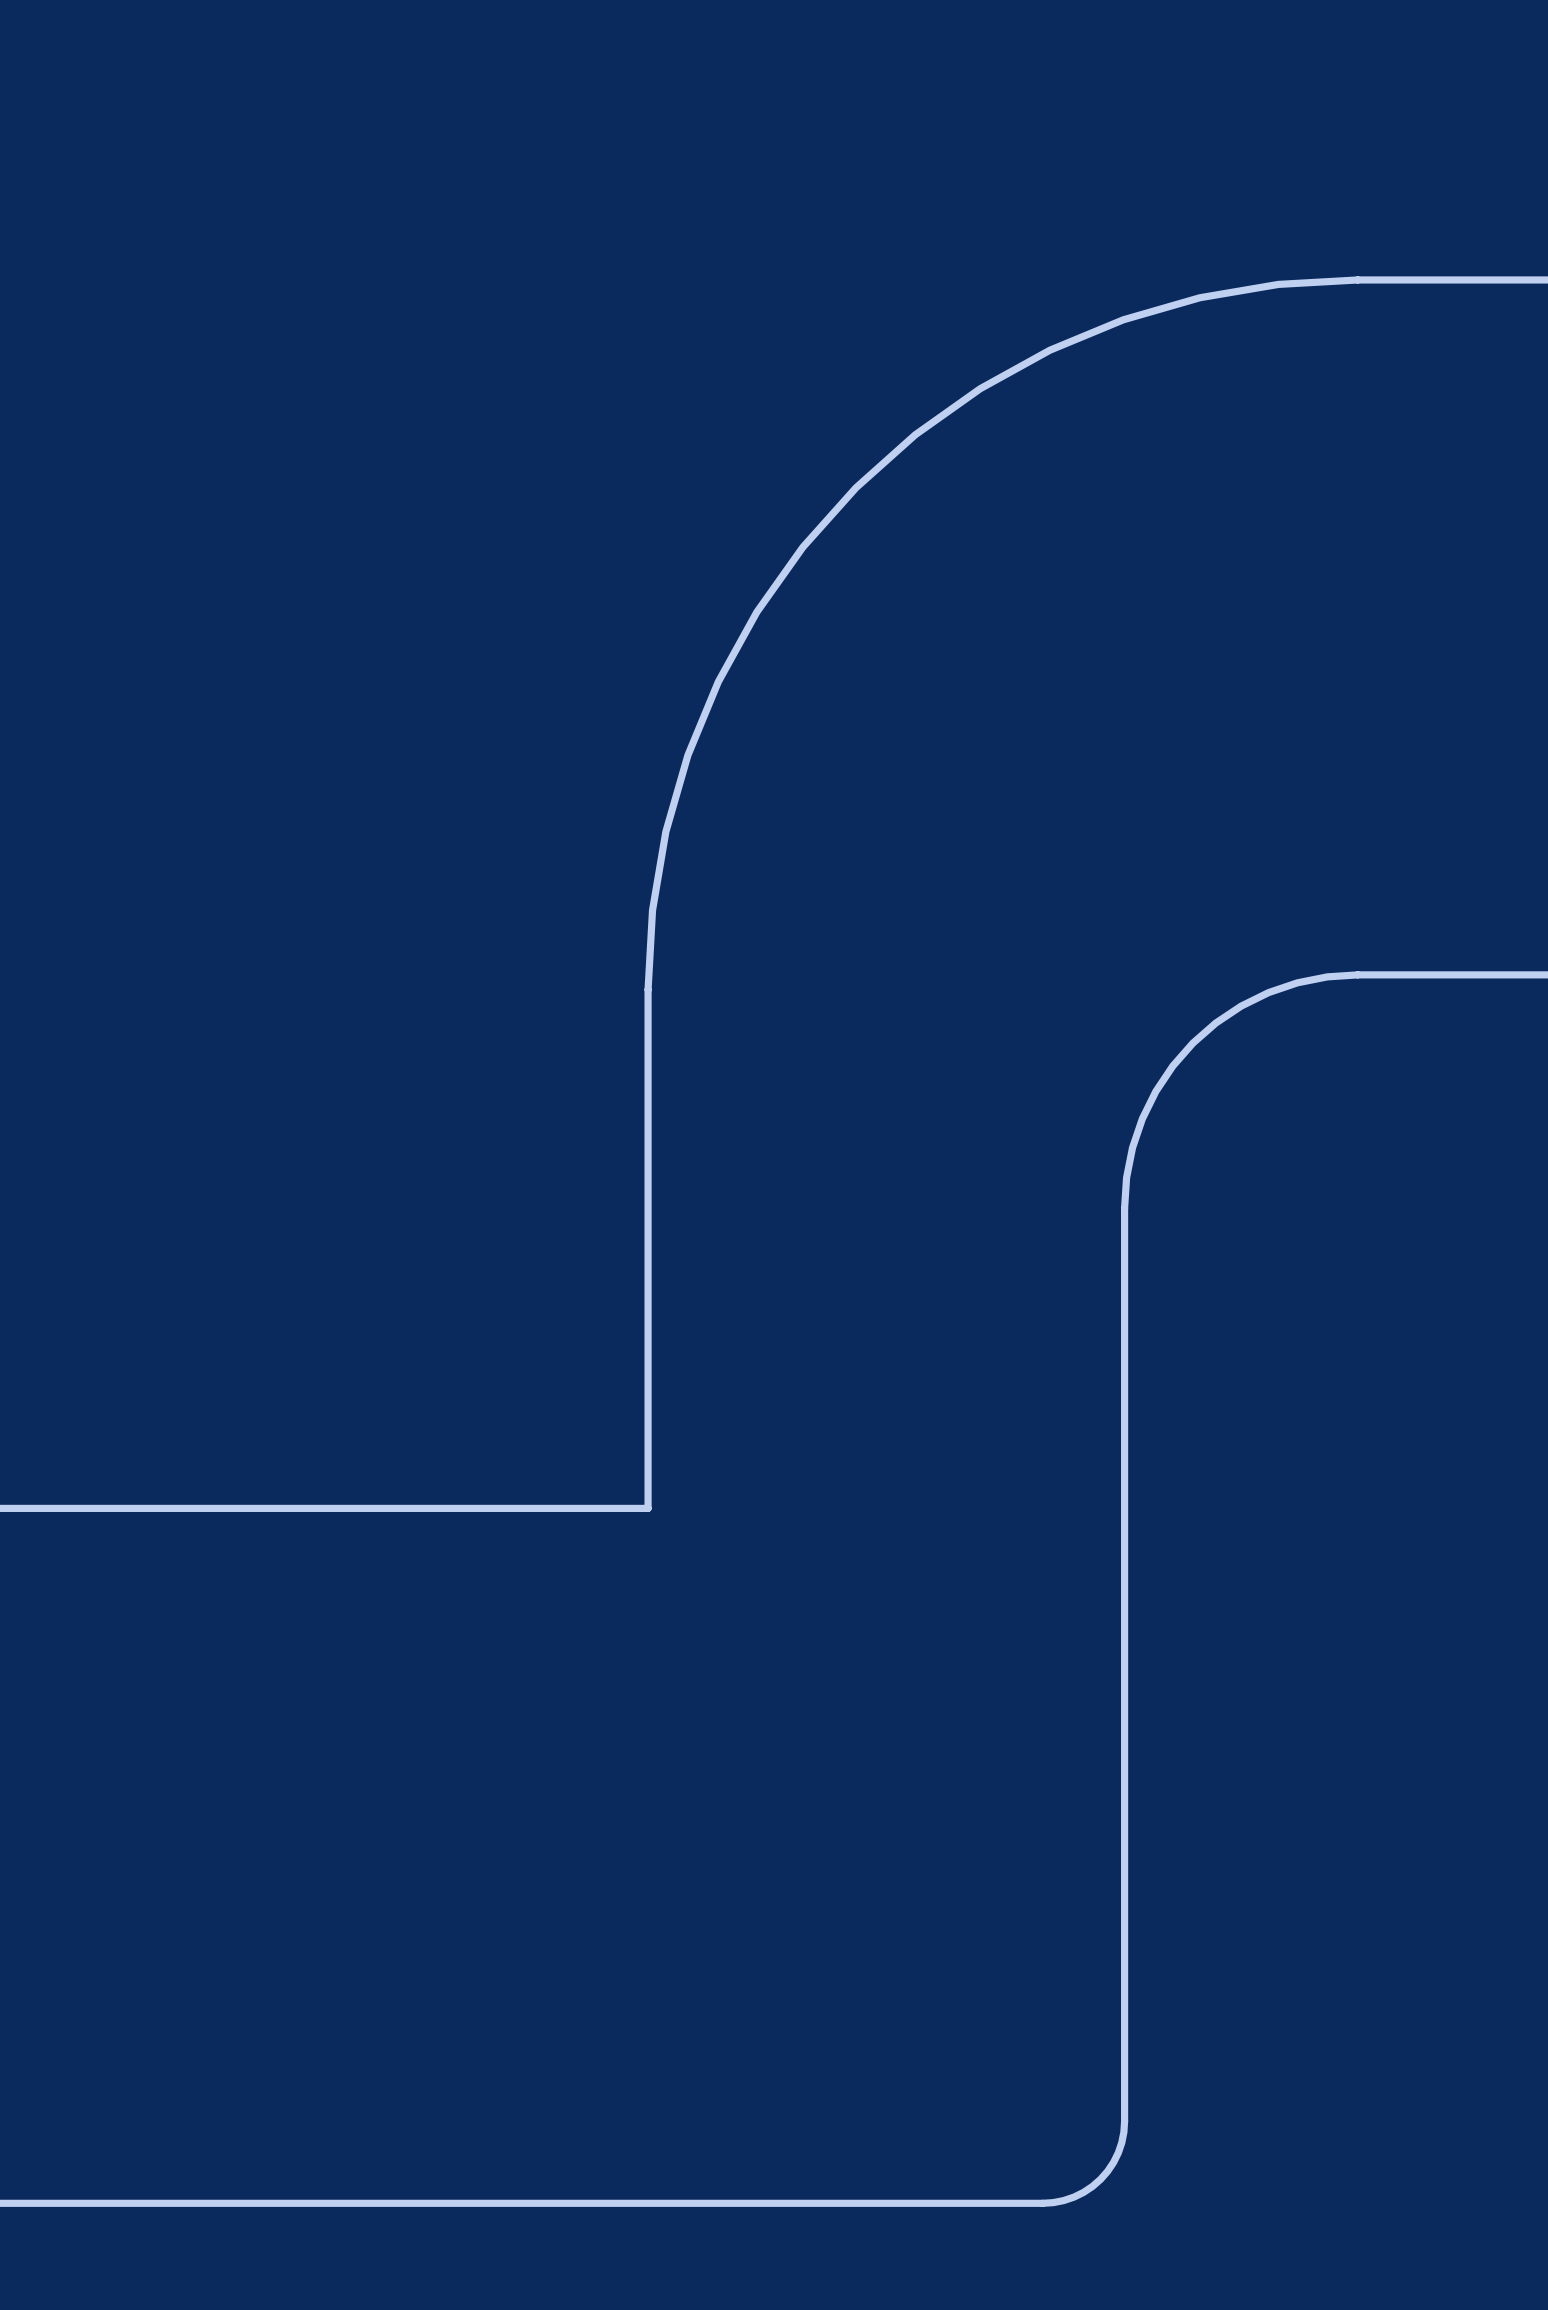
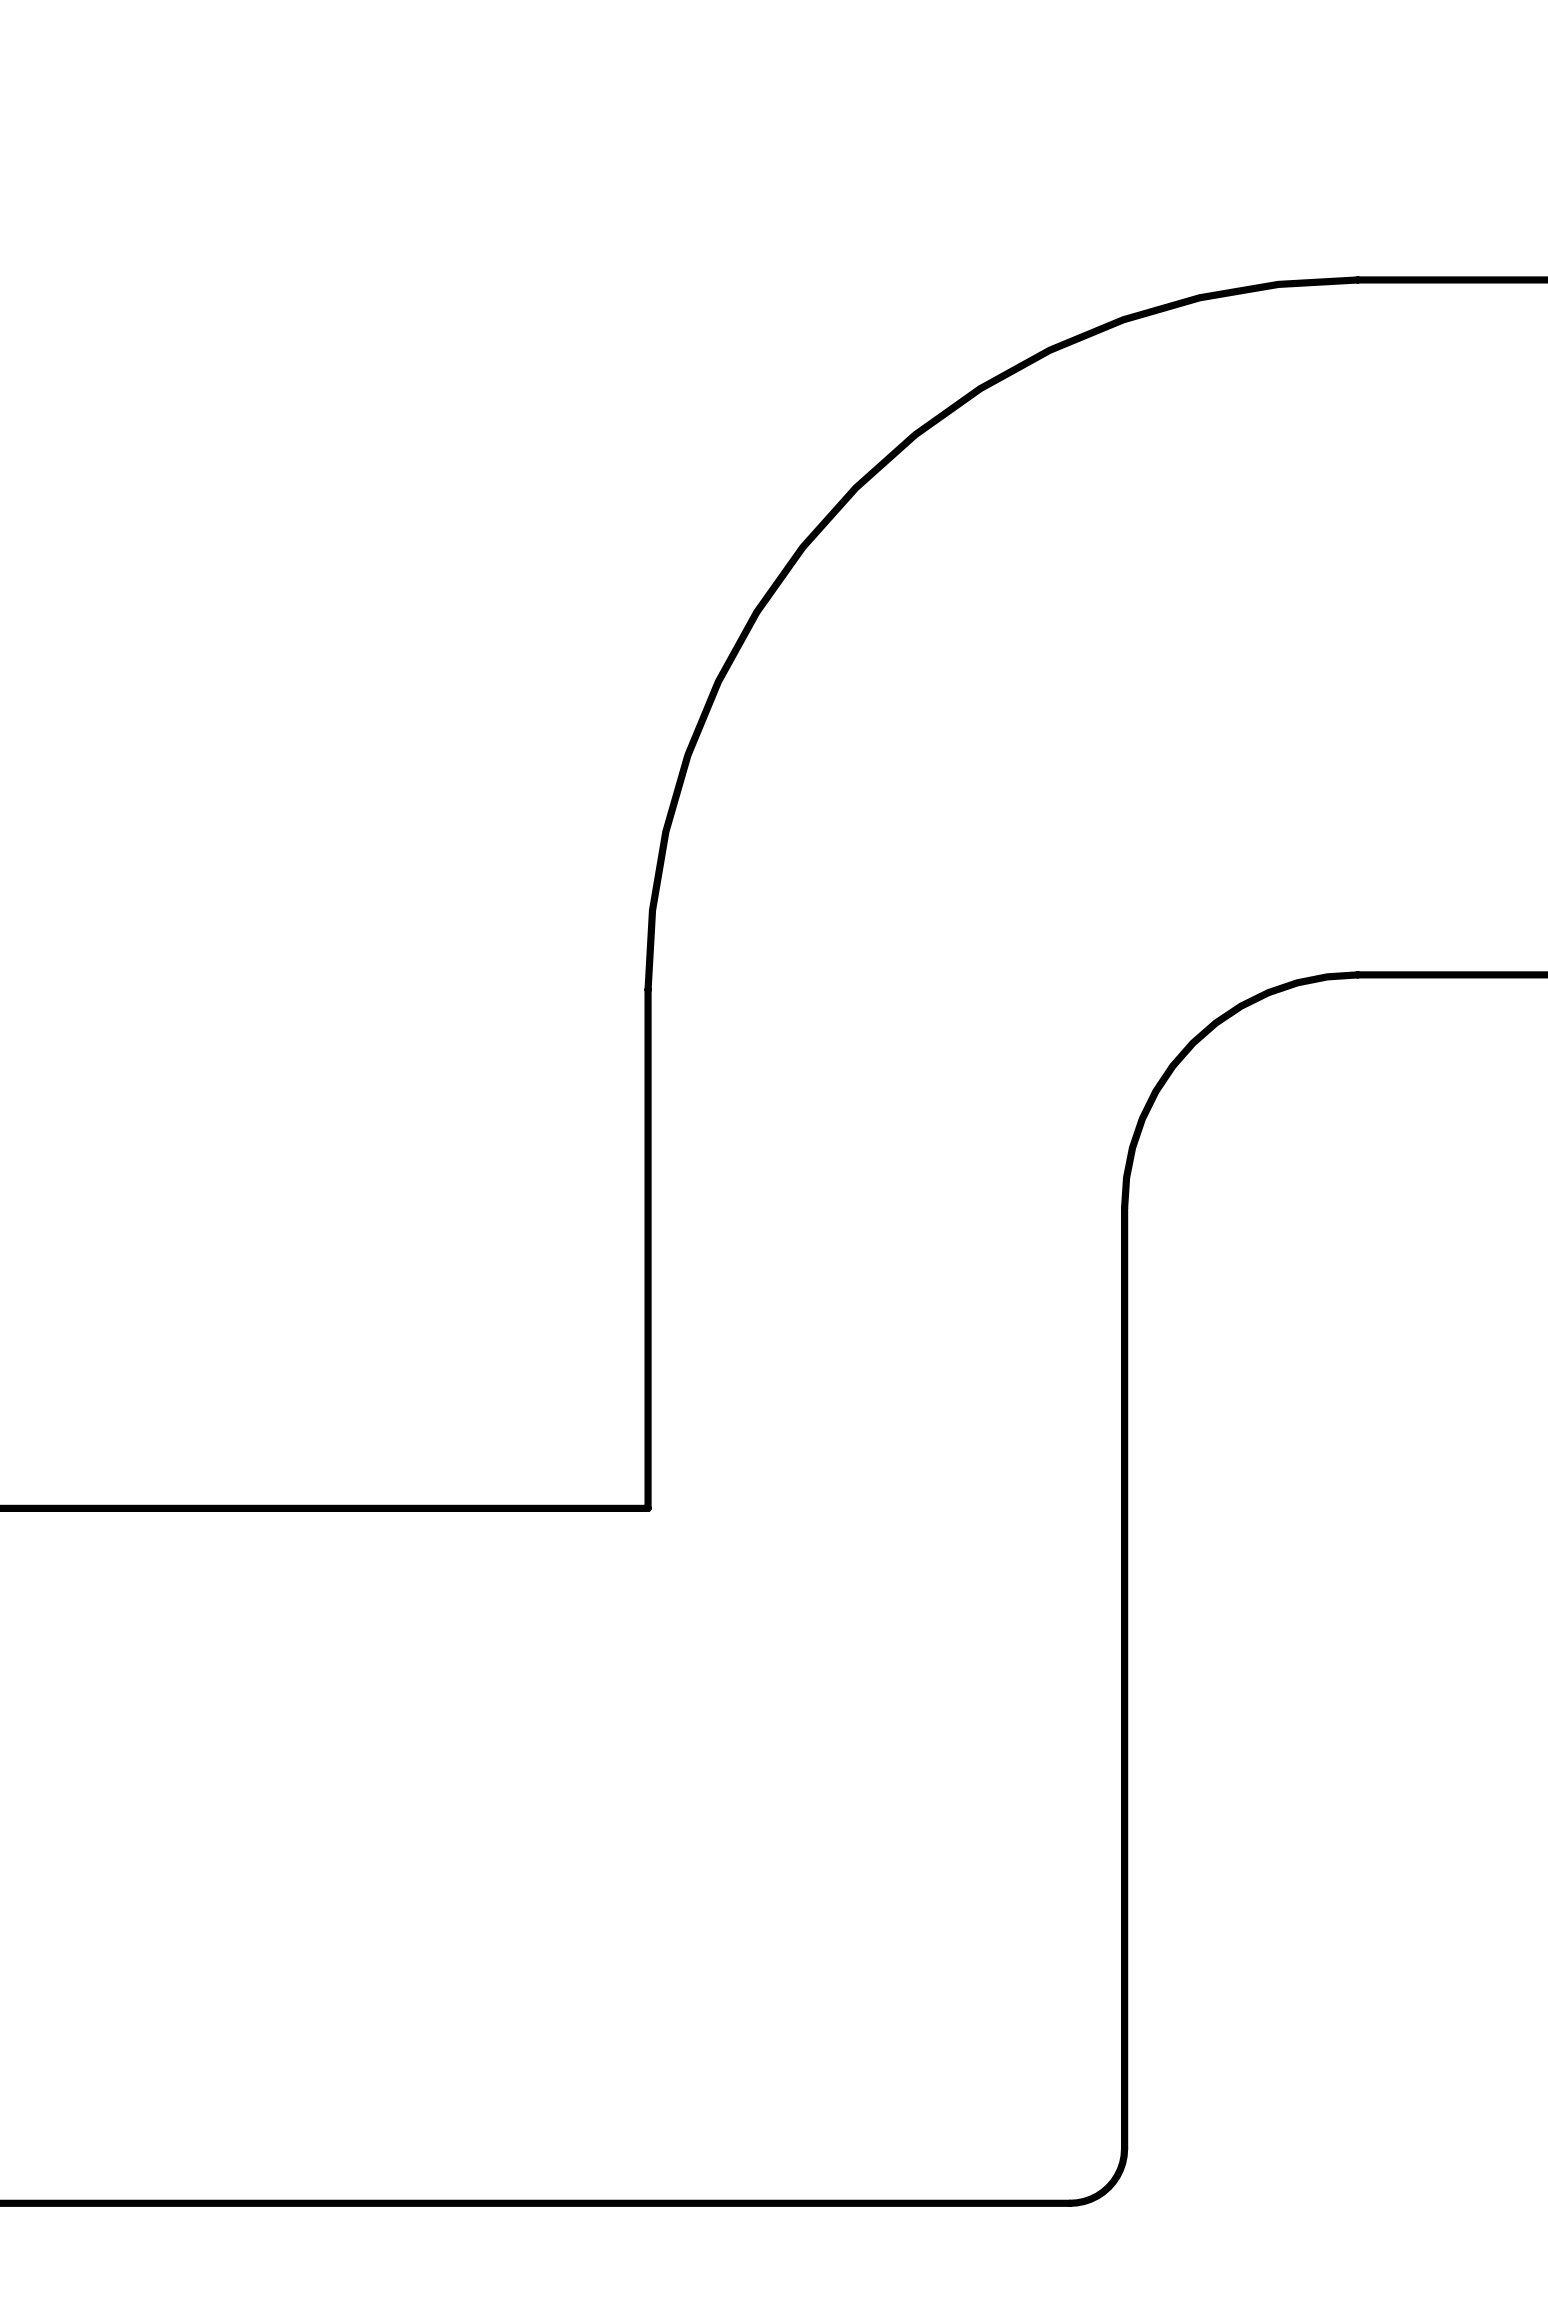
board edge: (1124, 2121) (1118, 2152) (1100, 2179) (1074, 2197) (1042, 2203) -> (1124, 2121) (1122, 2162) (1117, 2176) (1108, 2187) (1097, 2196) (1084, 2201) (1042, 2203)

